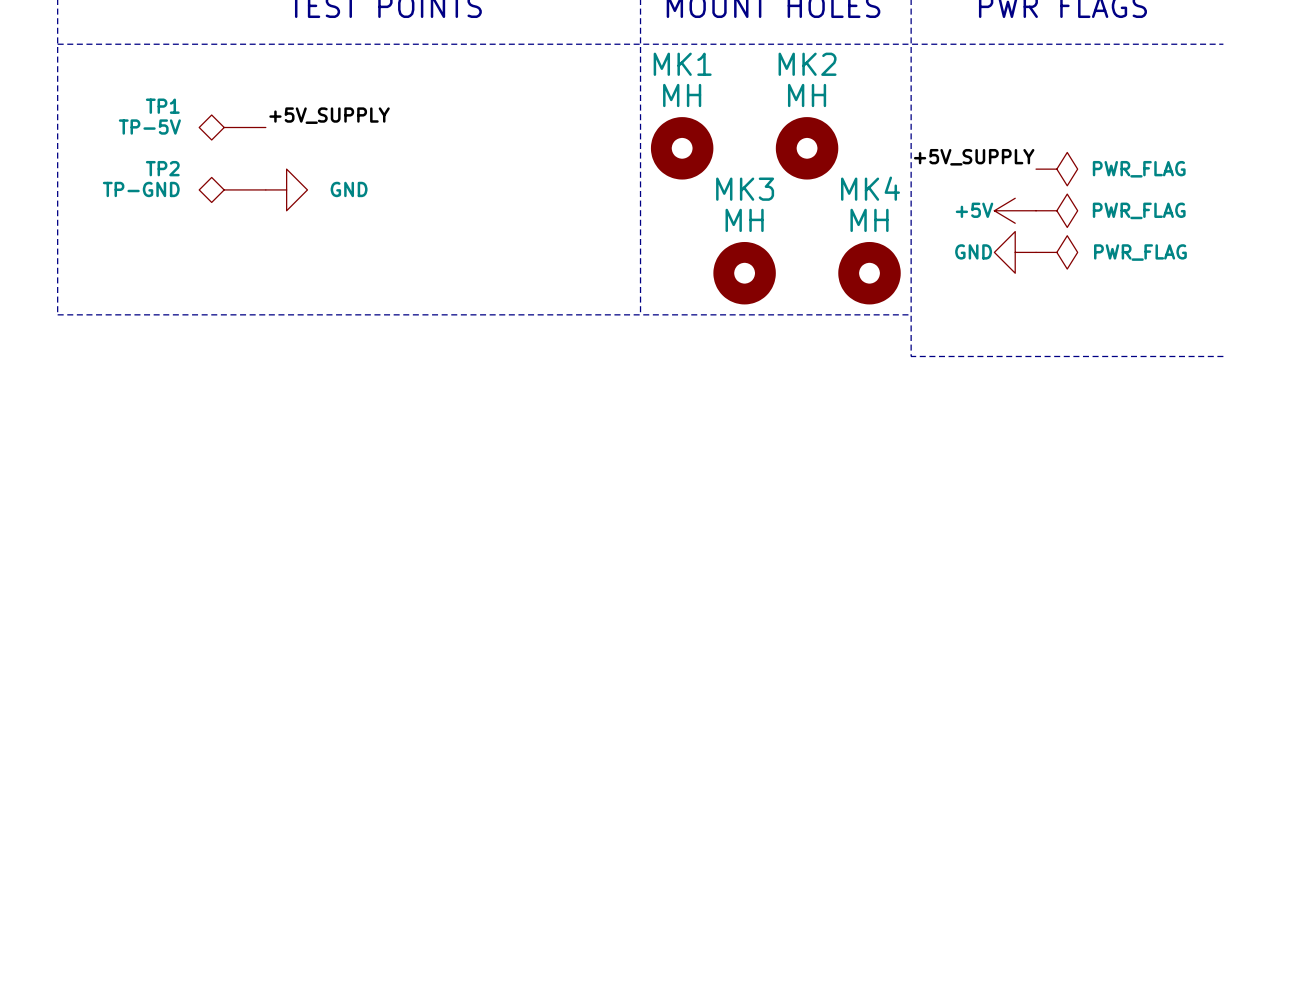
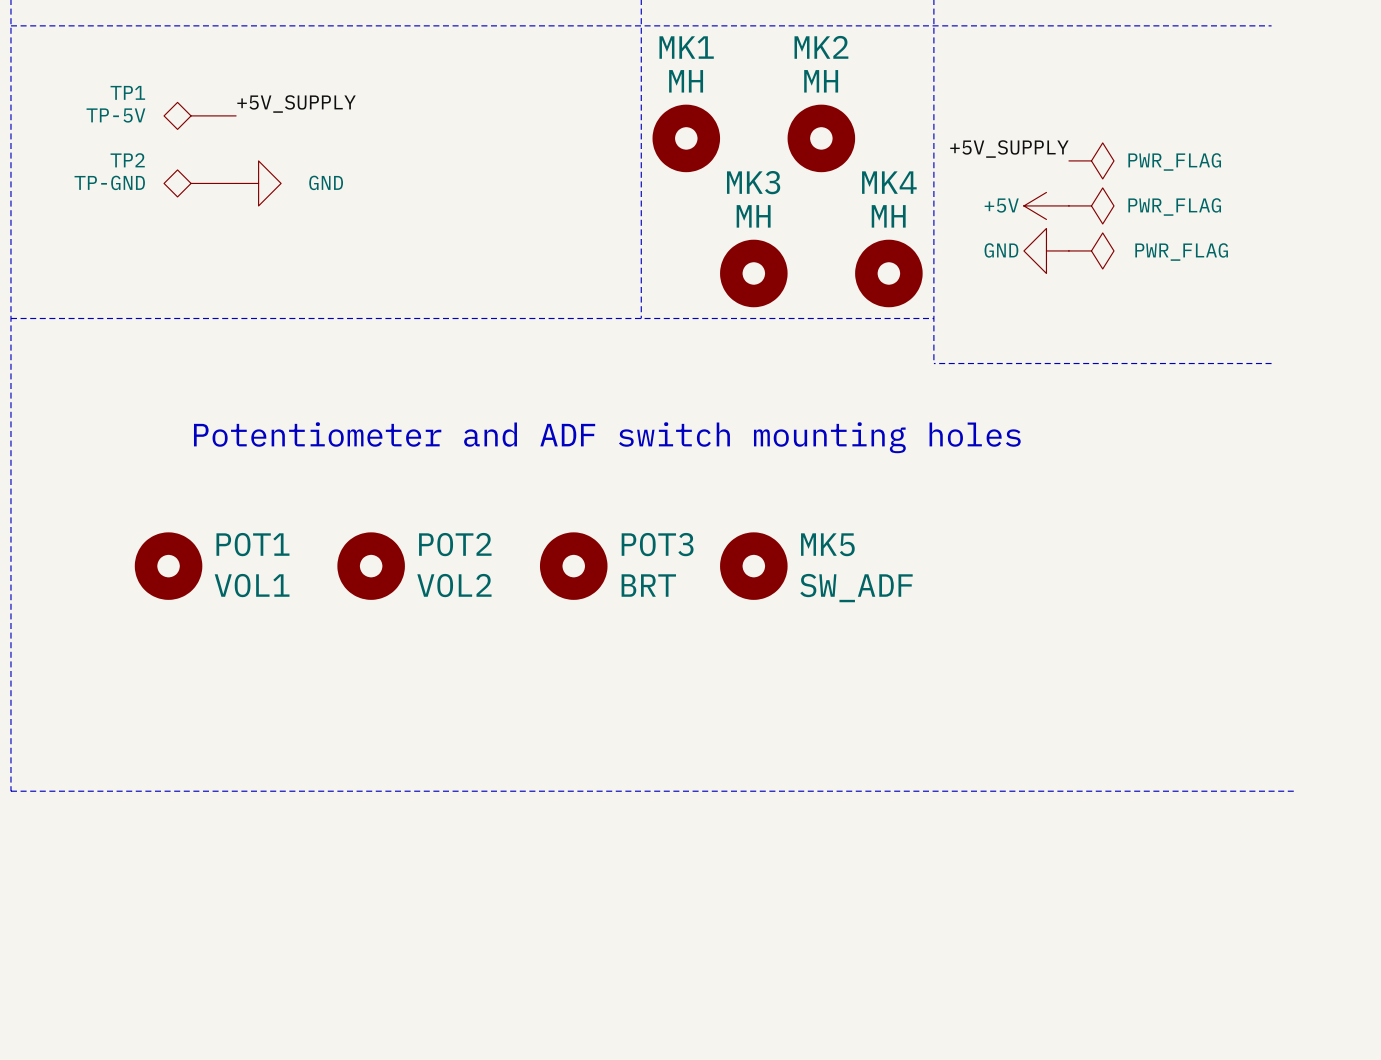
line: none -> (10, 318) (10, 791) (1294, 791)
text: none -> Potentiometer and ADF switch mounting holes (607, 437)
POT1: none -> VOL1 (168, 566)
POT2: none -> VOL2 (371, 566)
POT3: none -> BRT (573, 566)
MK5: none -> SW_ADF (753, 566)

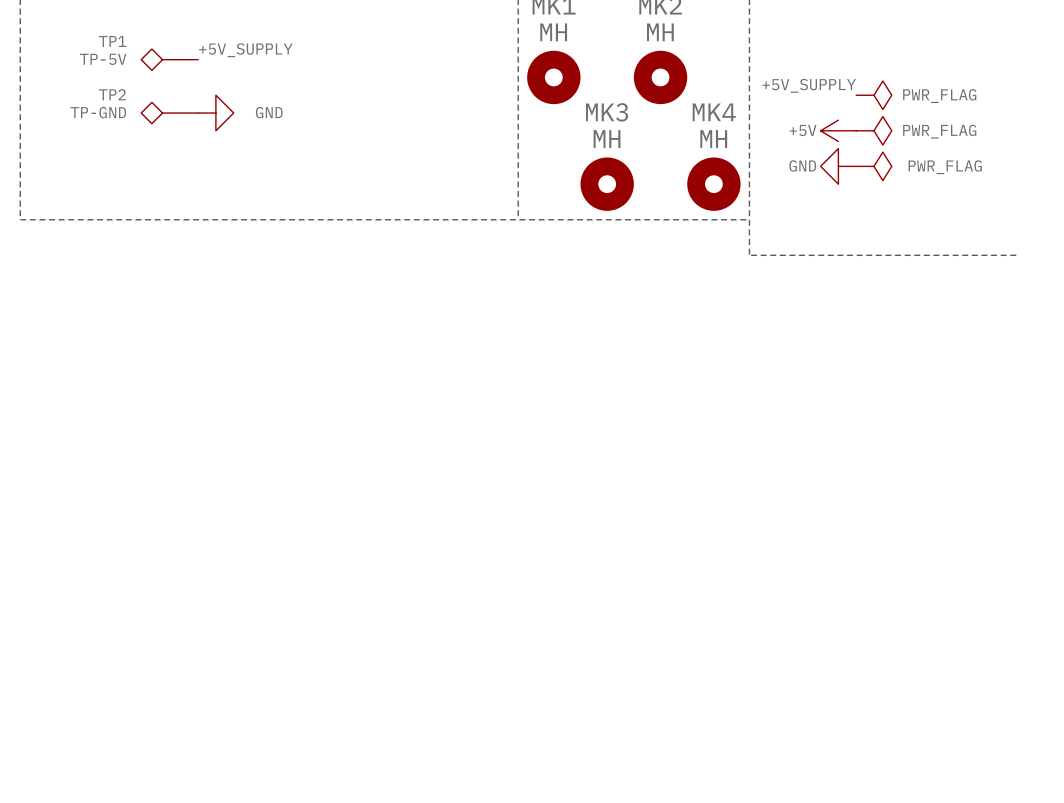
line: (10, 318) (10, 791) (1294, 791) -> none
text: Potentiometer and ADF switch mounting holes (607, 437) -> none
POT1: VOL1 (168, 566) -> none
POT2: VOL2 (371, 566) -> none
POT3: BRT (573, 566) -> none
MK5: SW_ADF (753, 566) -> none

